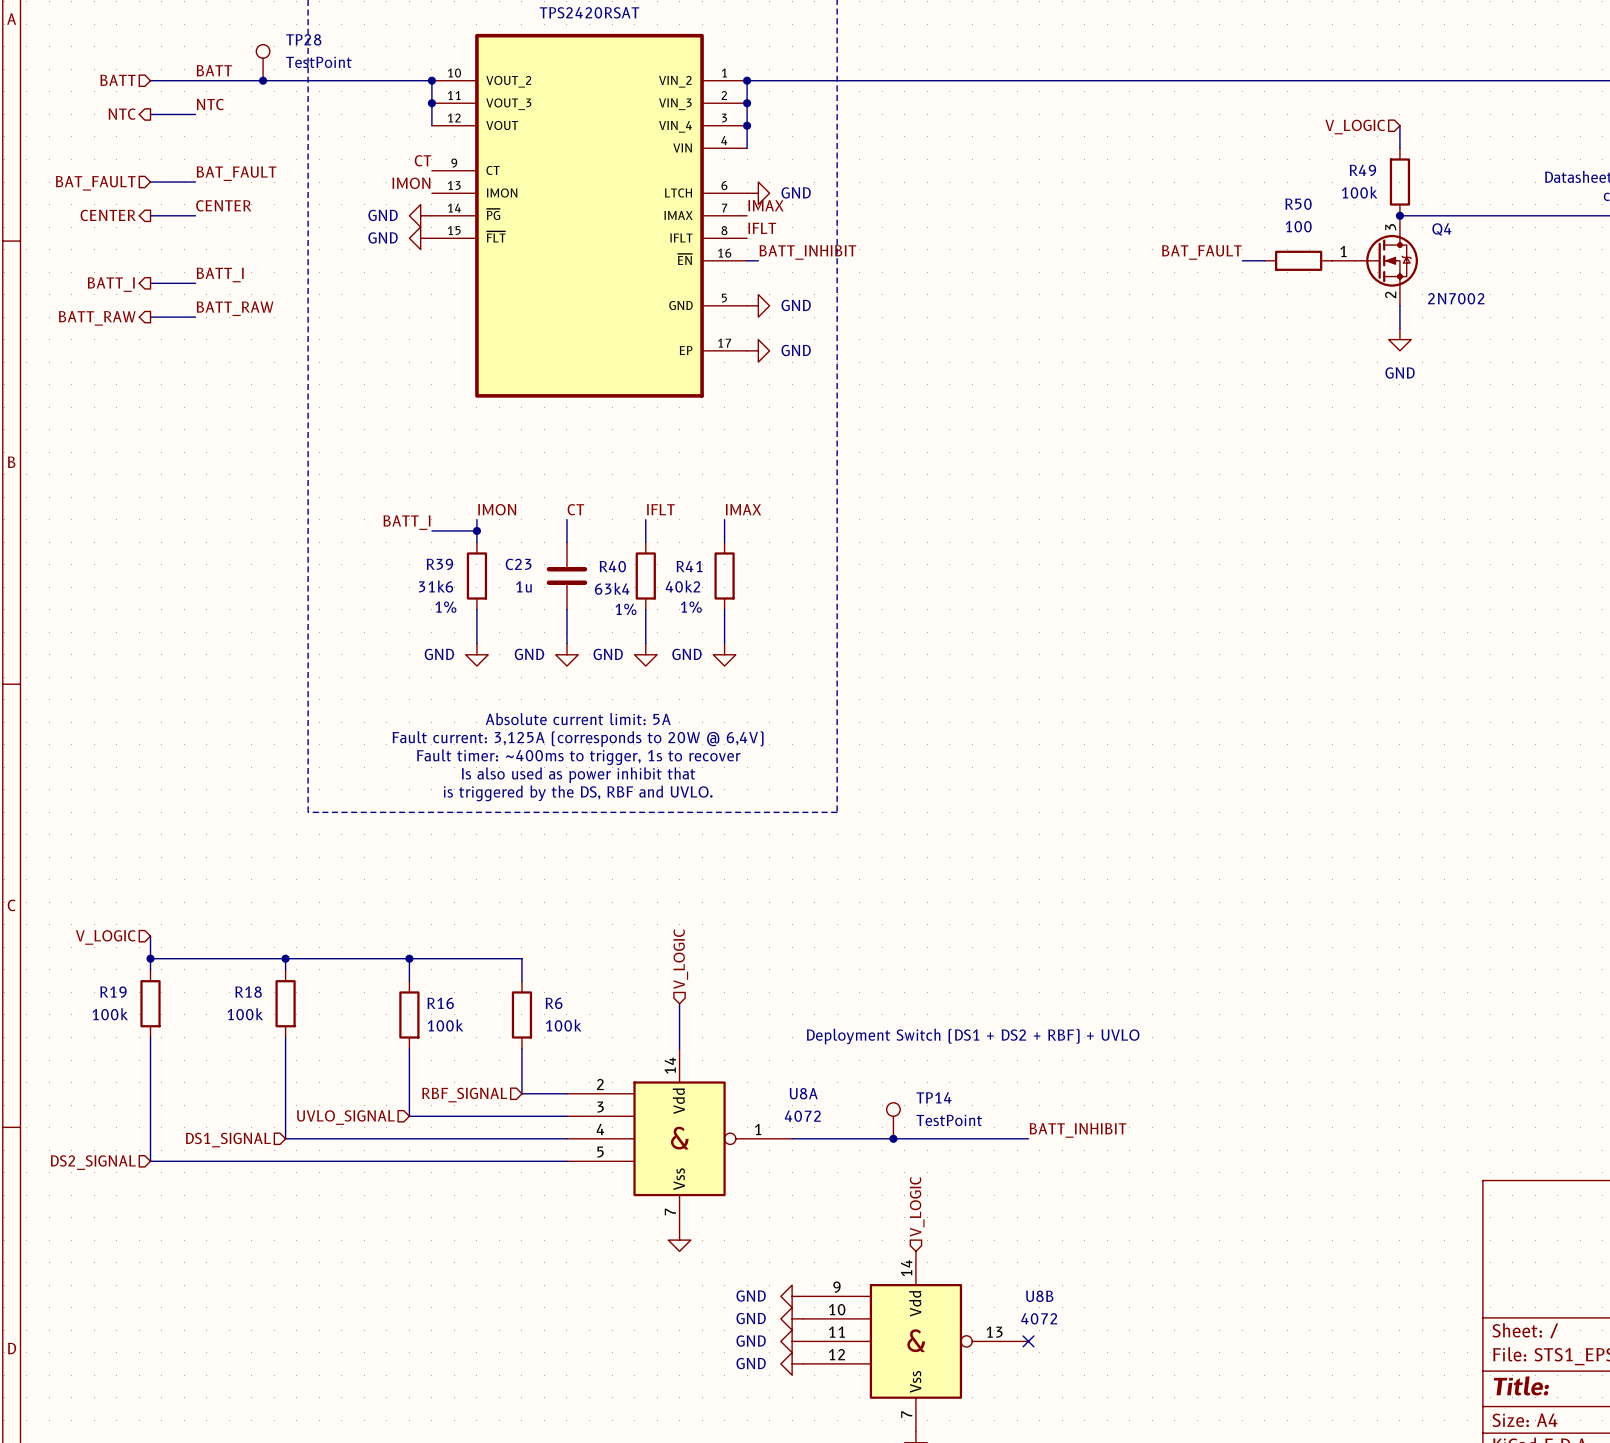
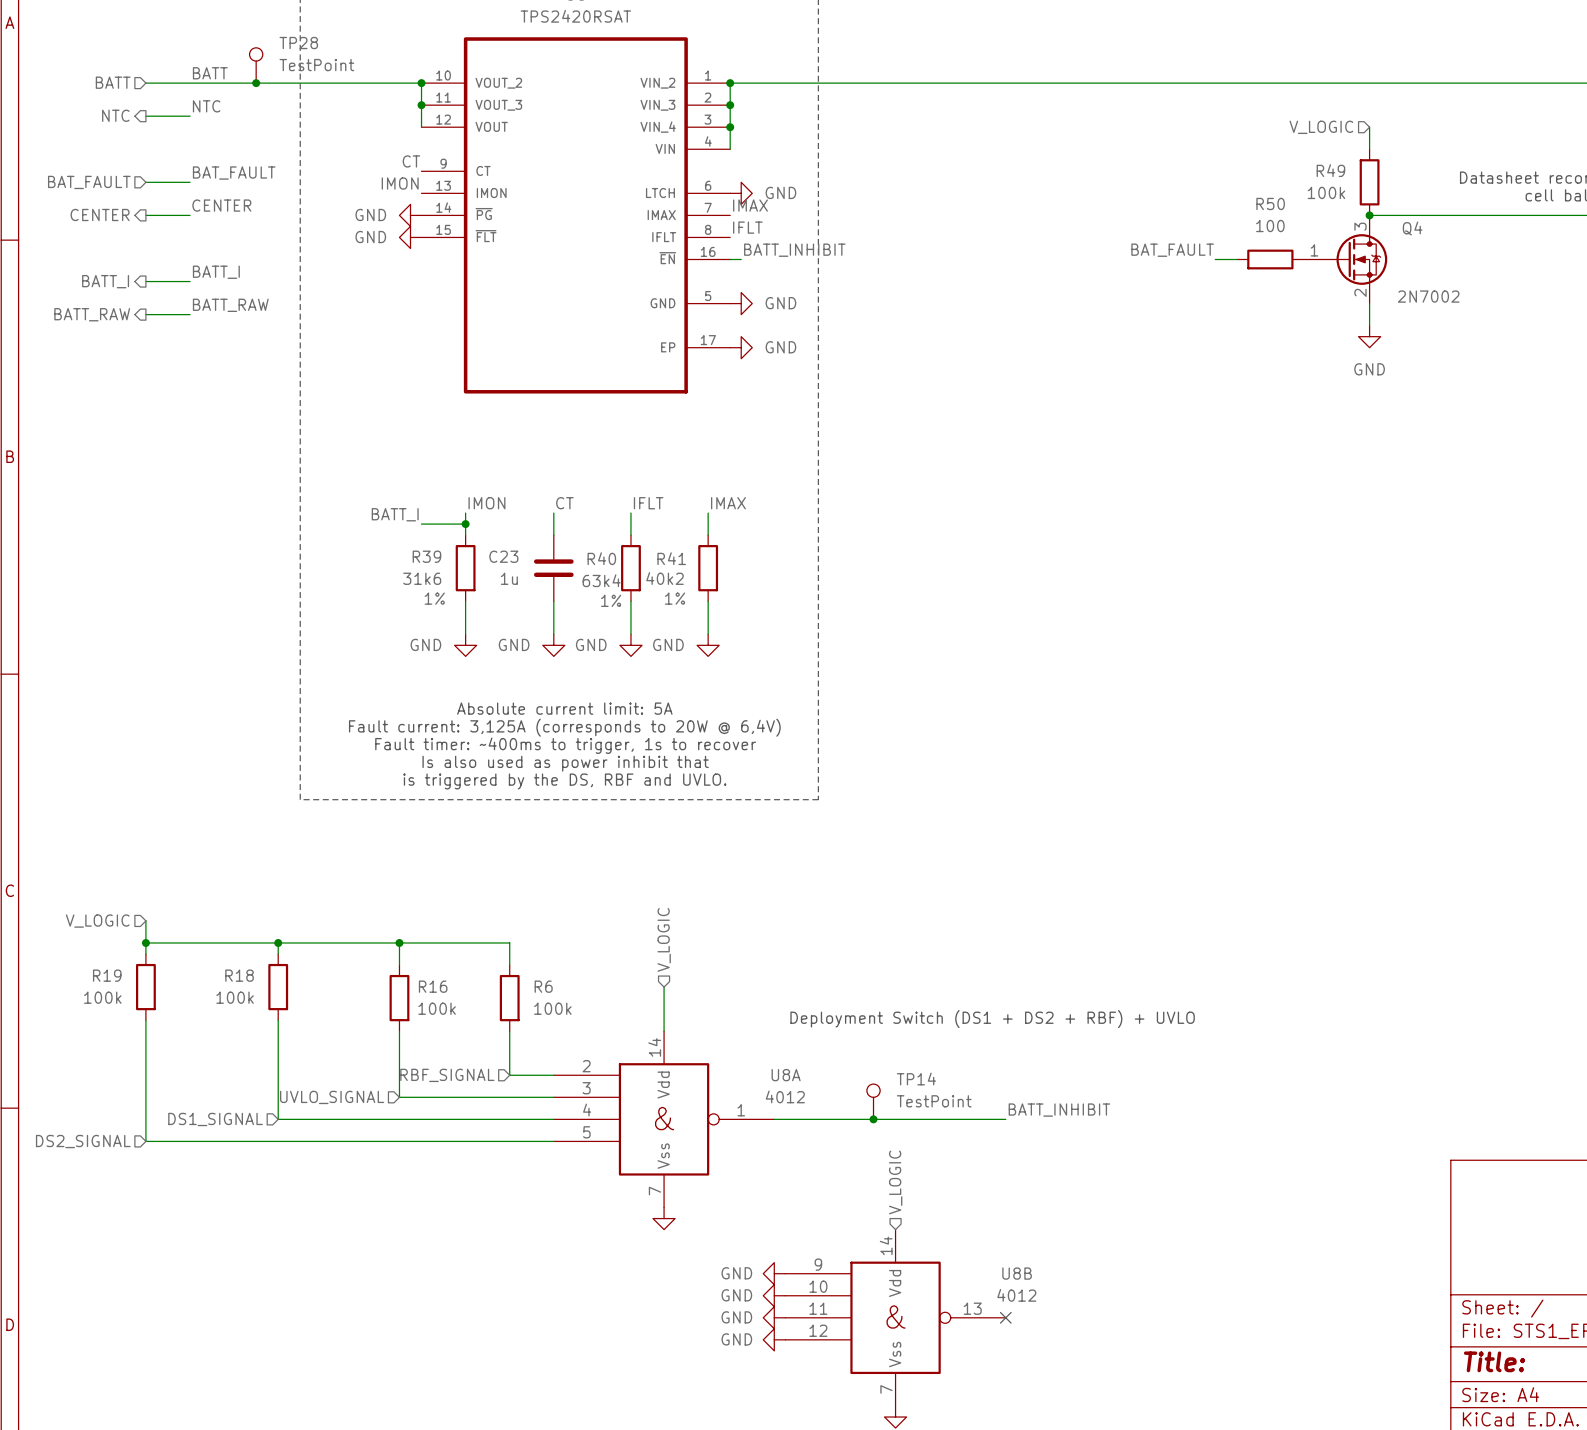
U8A value: 4072 (802, 1116) -> 4012 (785, 1096)
U8B value: 4072 (1039, 1318) -> 4012 (1016, 1295)

